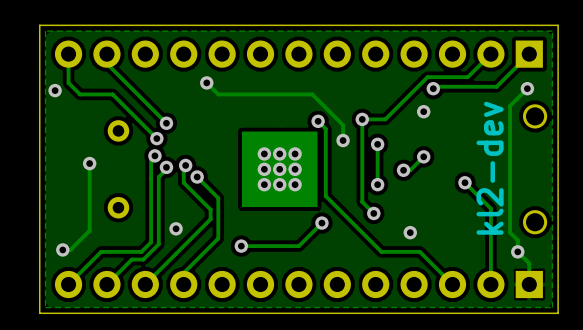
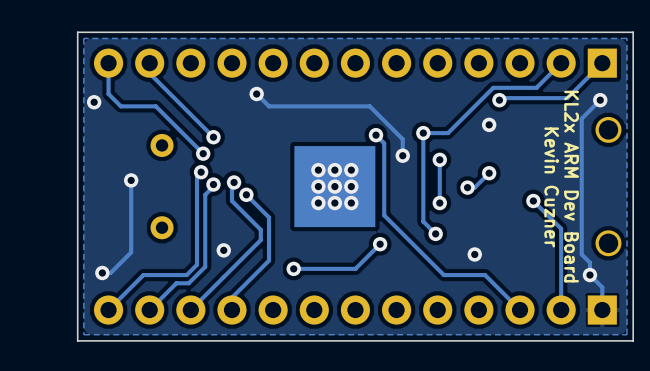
text: kl2-dev (490, 168) -> none
text: none -> KL2x ARM Dev Board (571, 186)
text: none -> Kevin Cuzner (551, 187)

